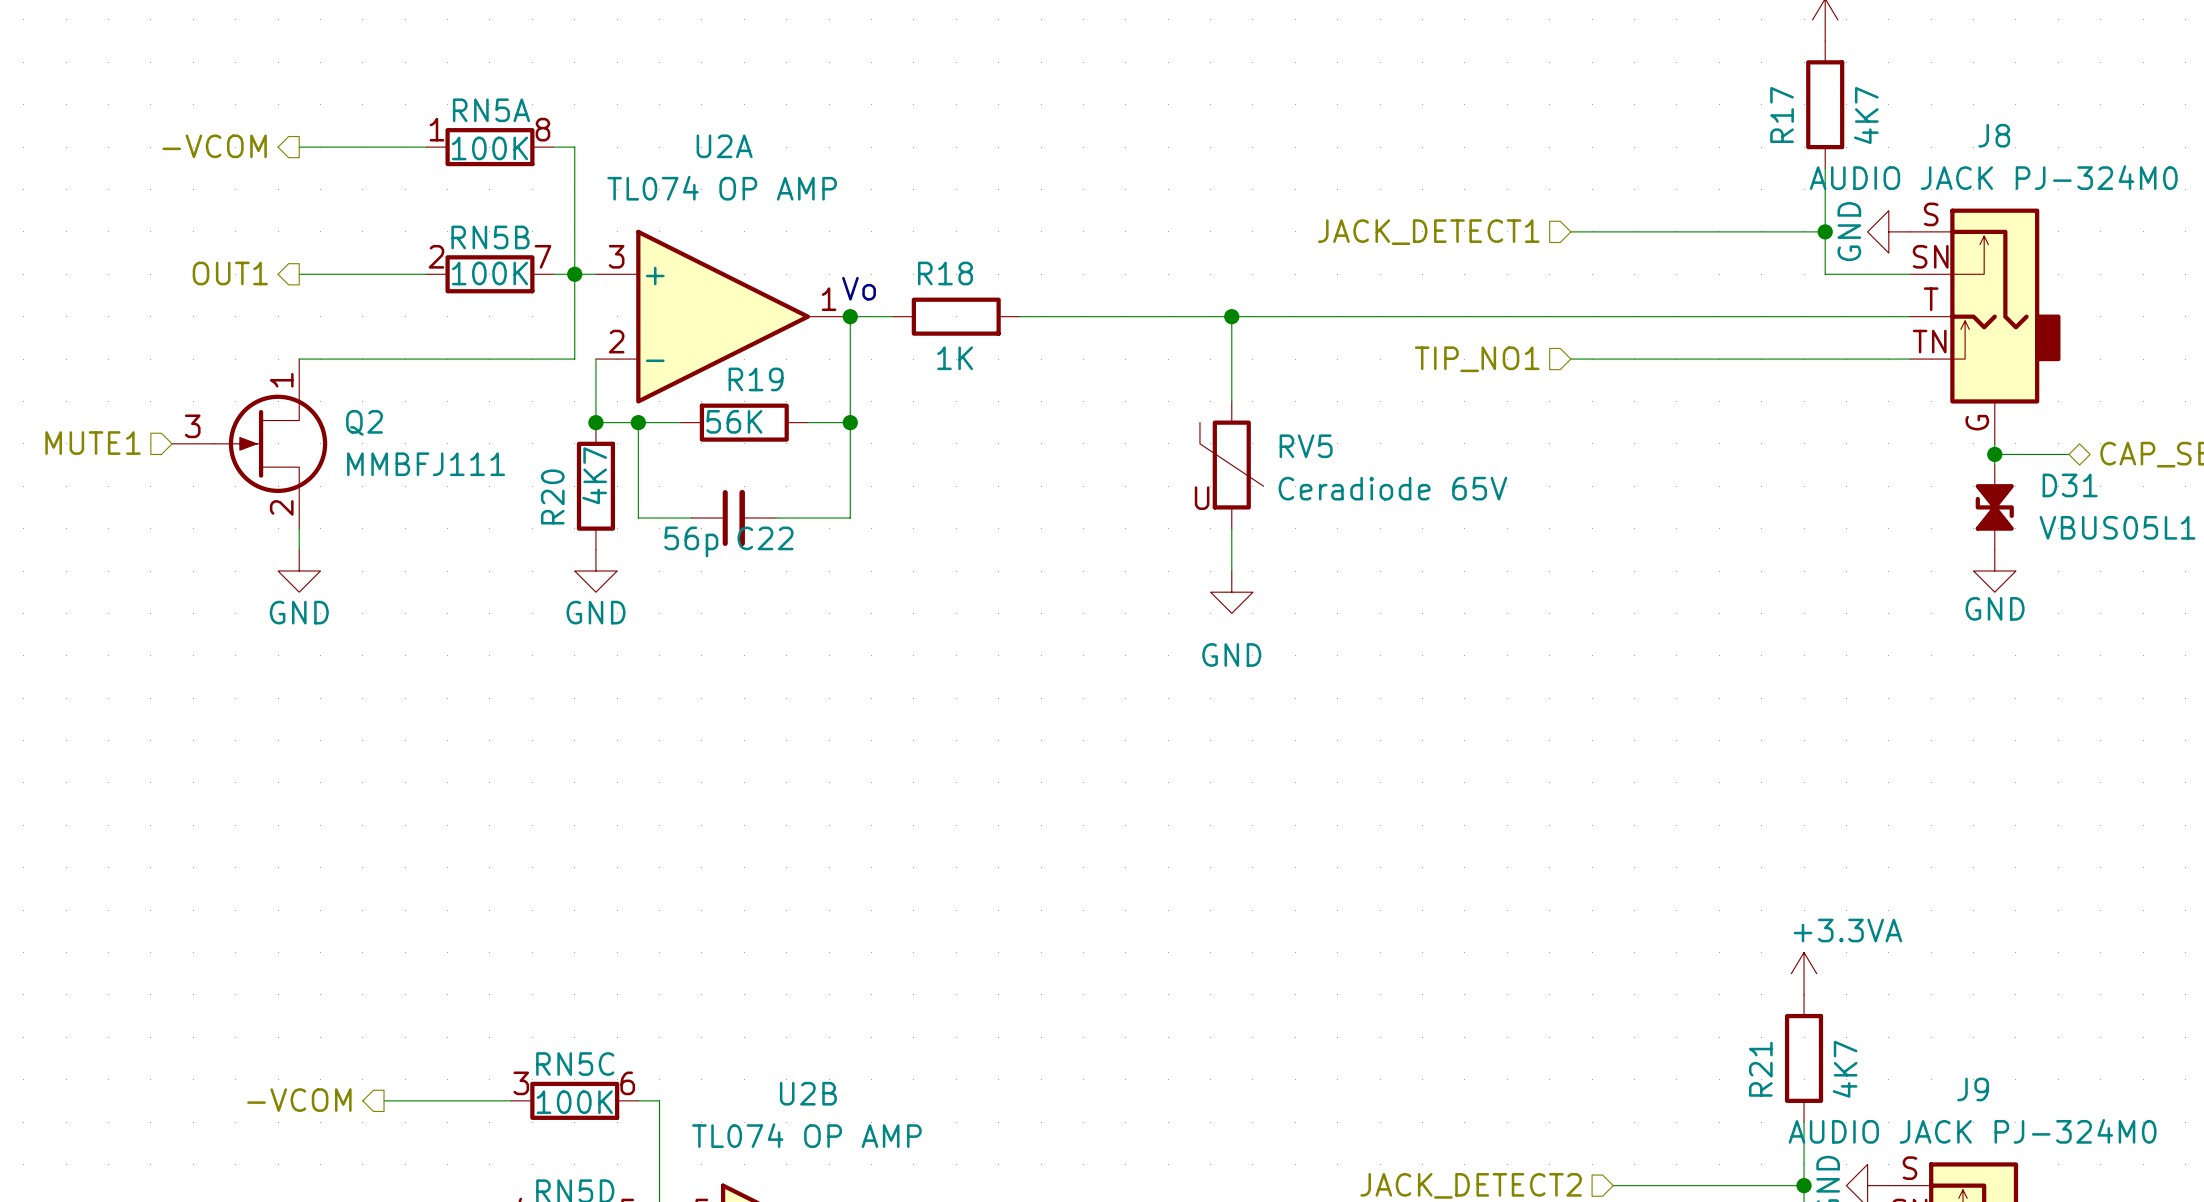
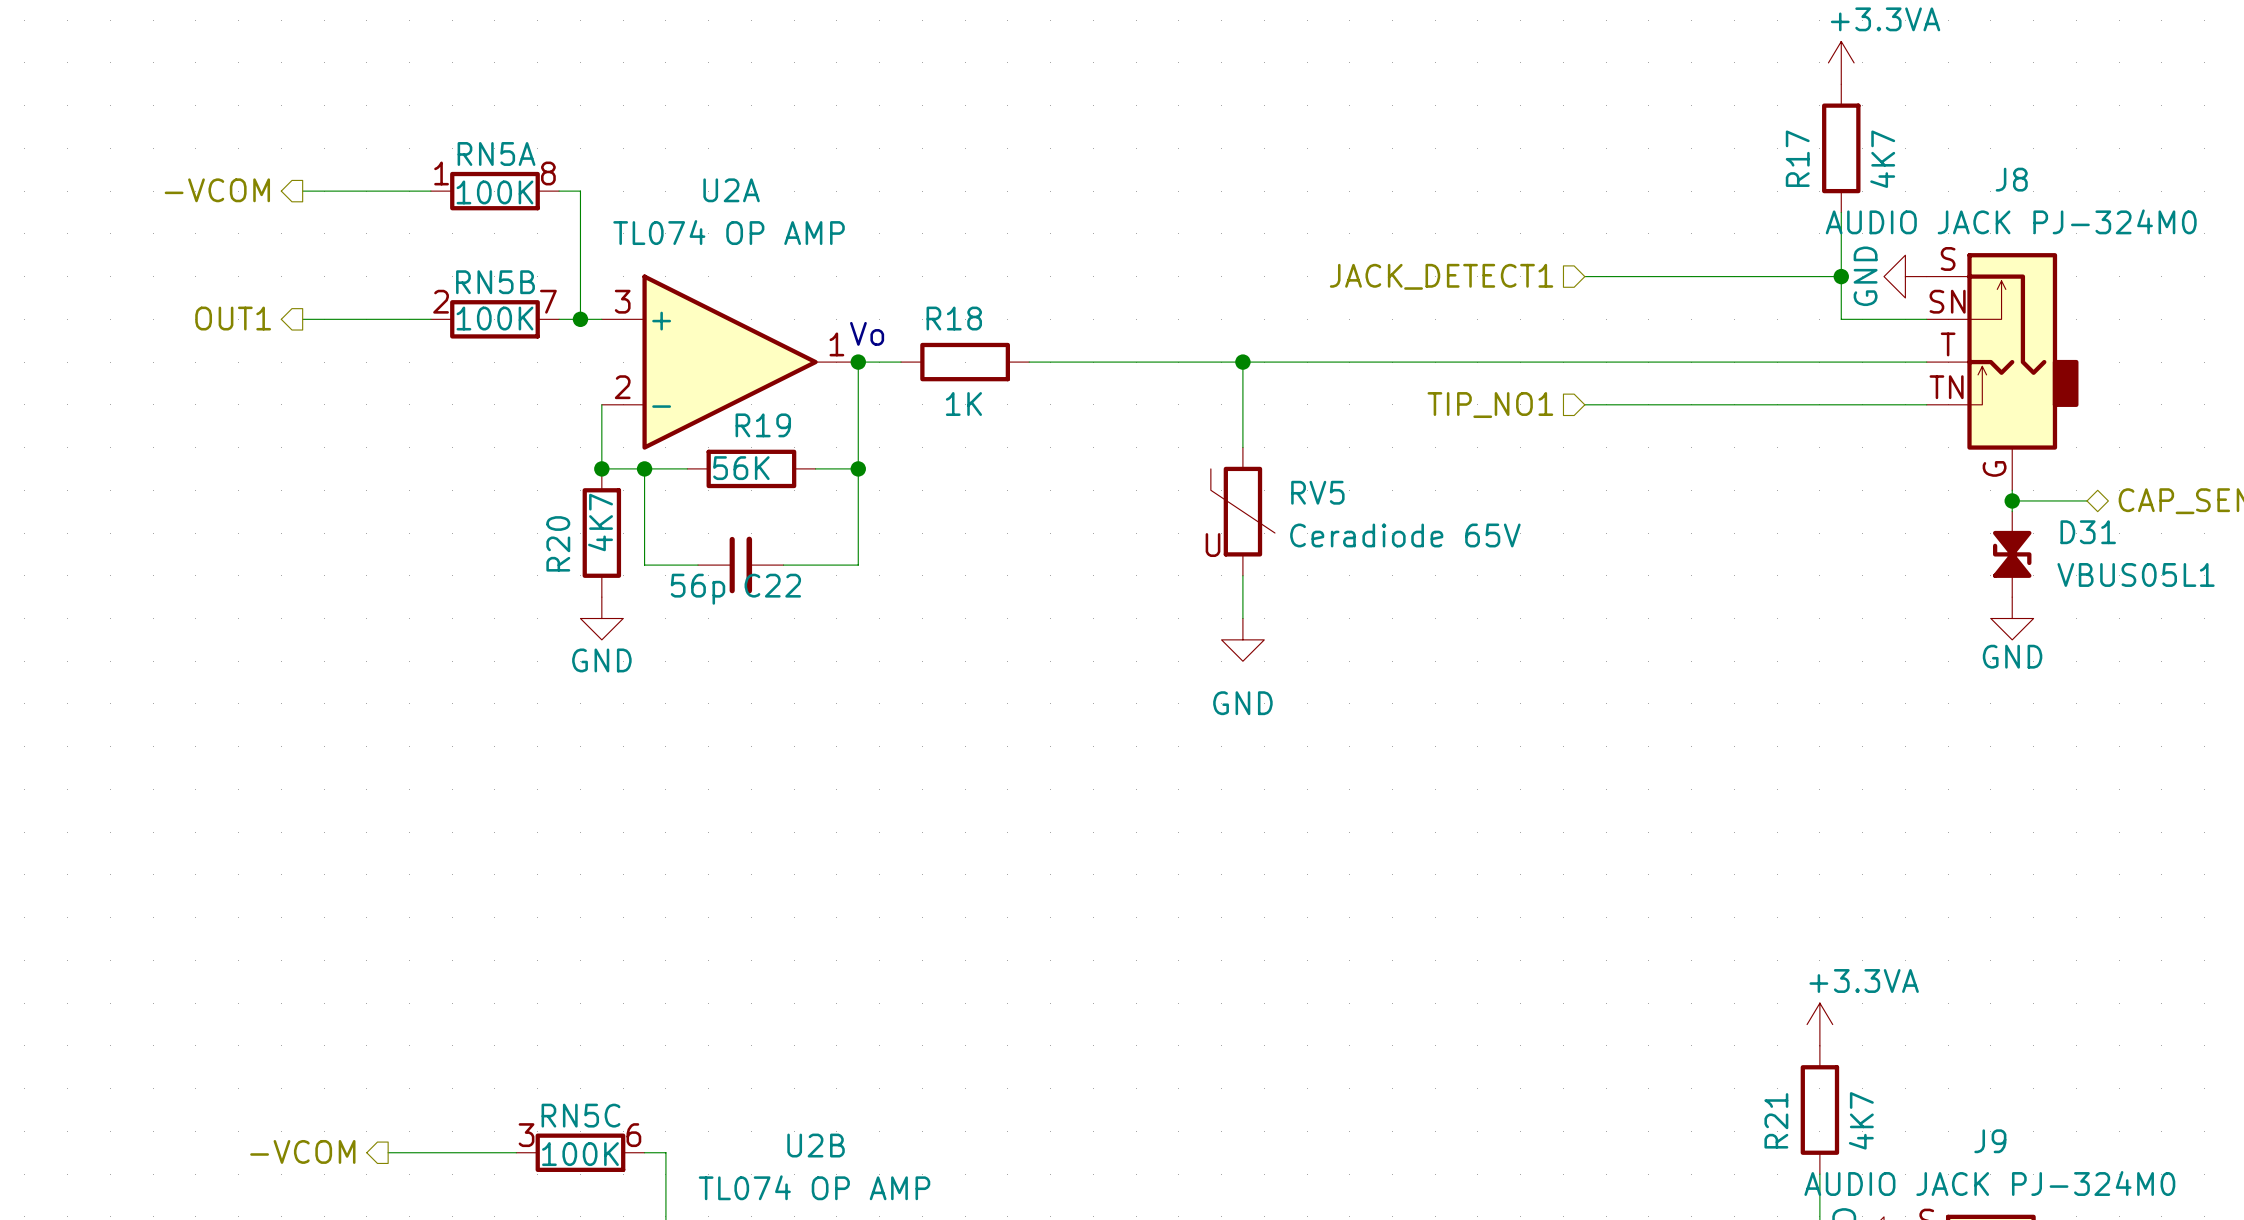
wire: (574, 274) (574, 359) (299, 359) -> none
hierarchical label: MUTE1 (93, 443) -> none
Q2: MMBFJ111 (249, 443) -> none
wire: (299, 528) (299, 549) -> none
power symbol: GND (299, 571) -> none

